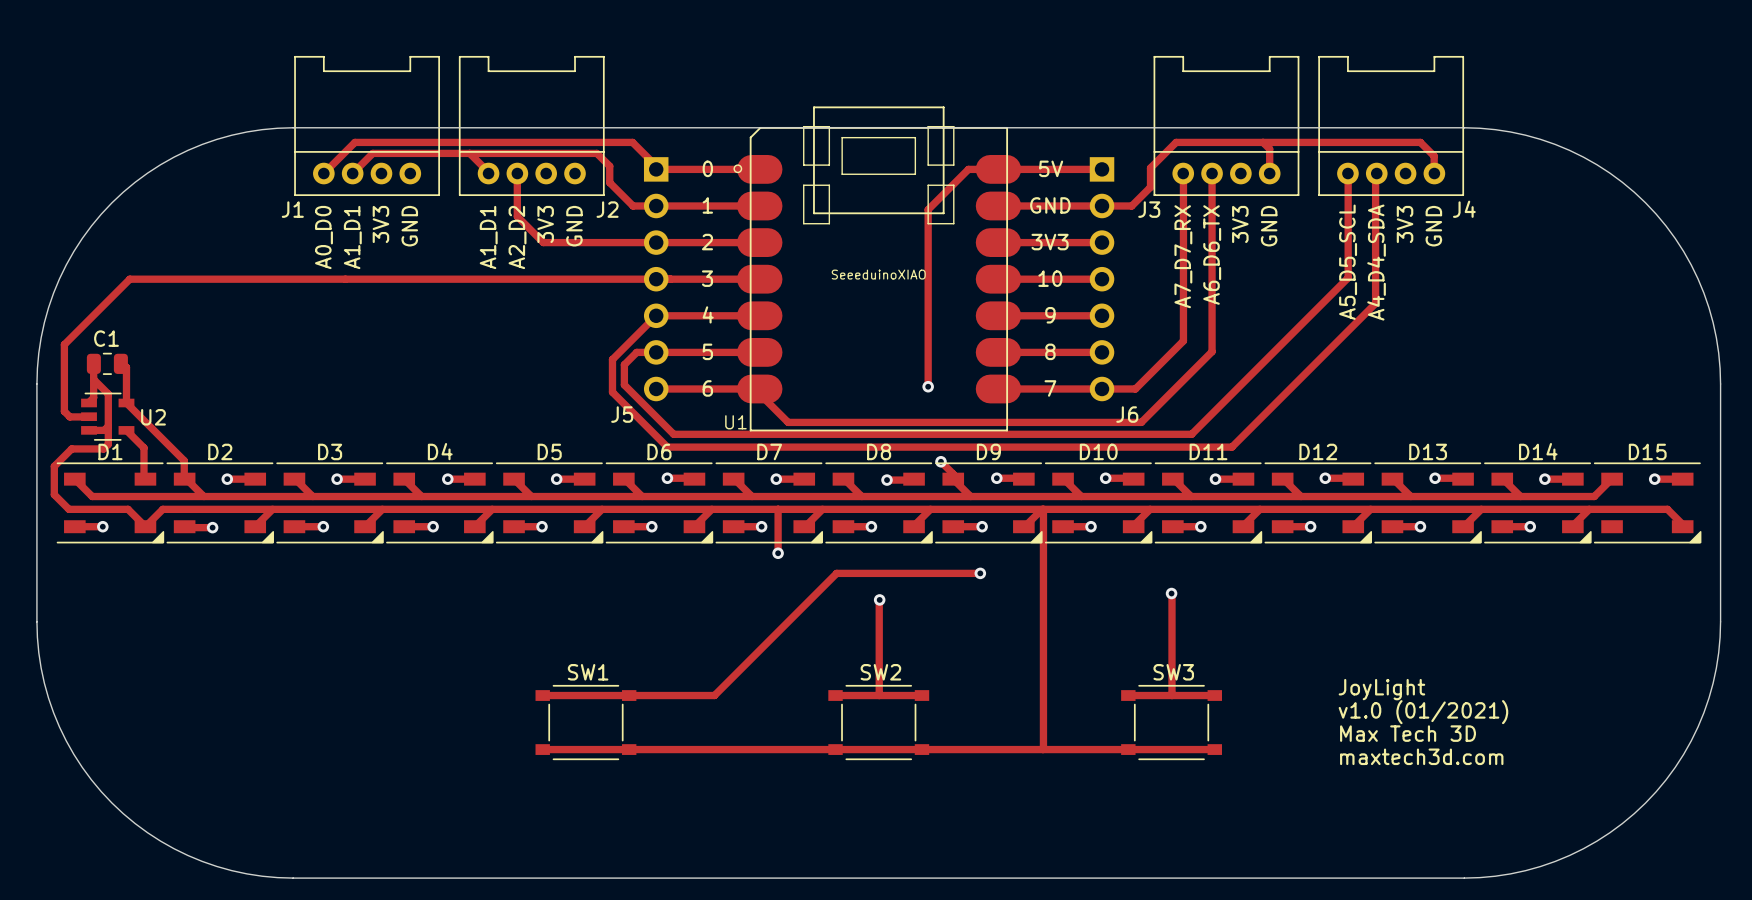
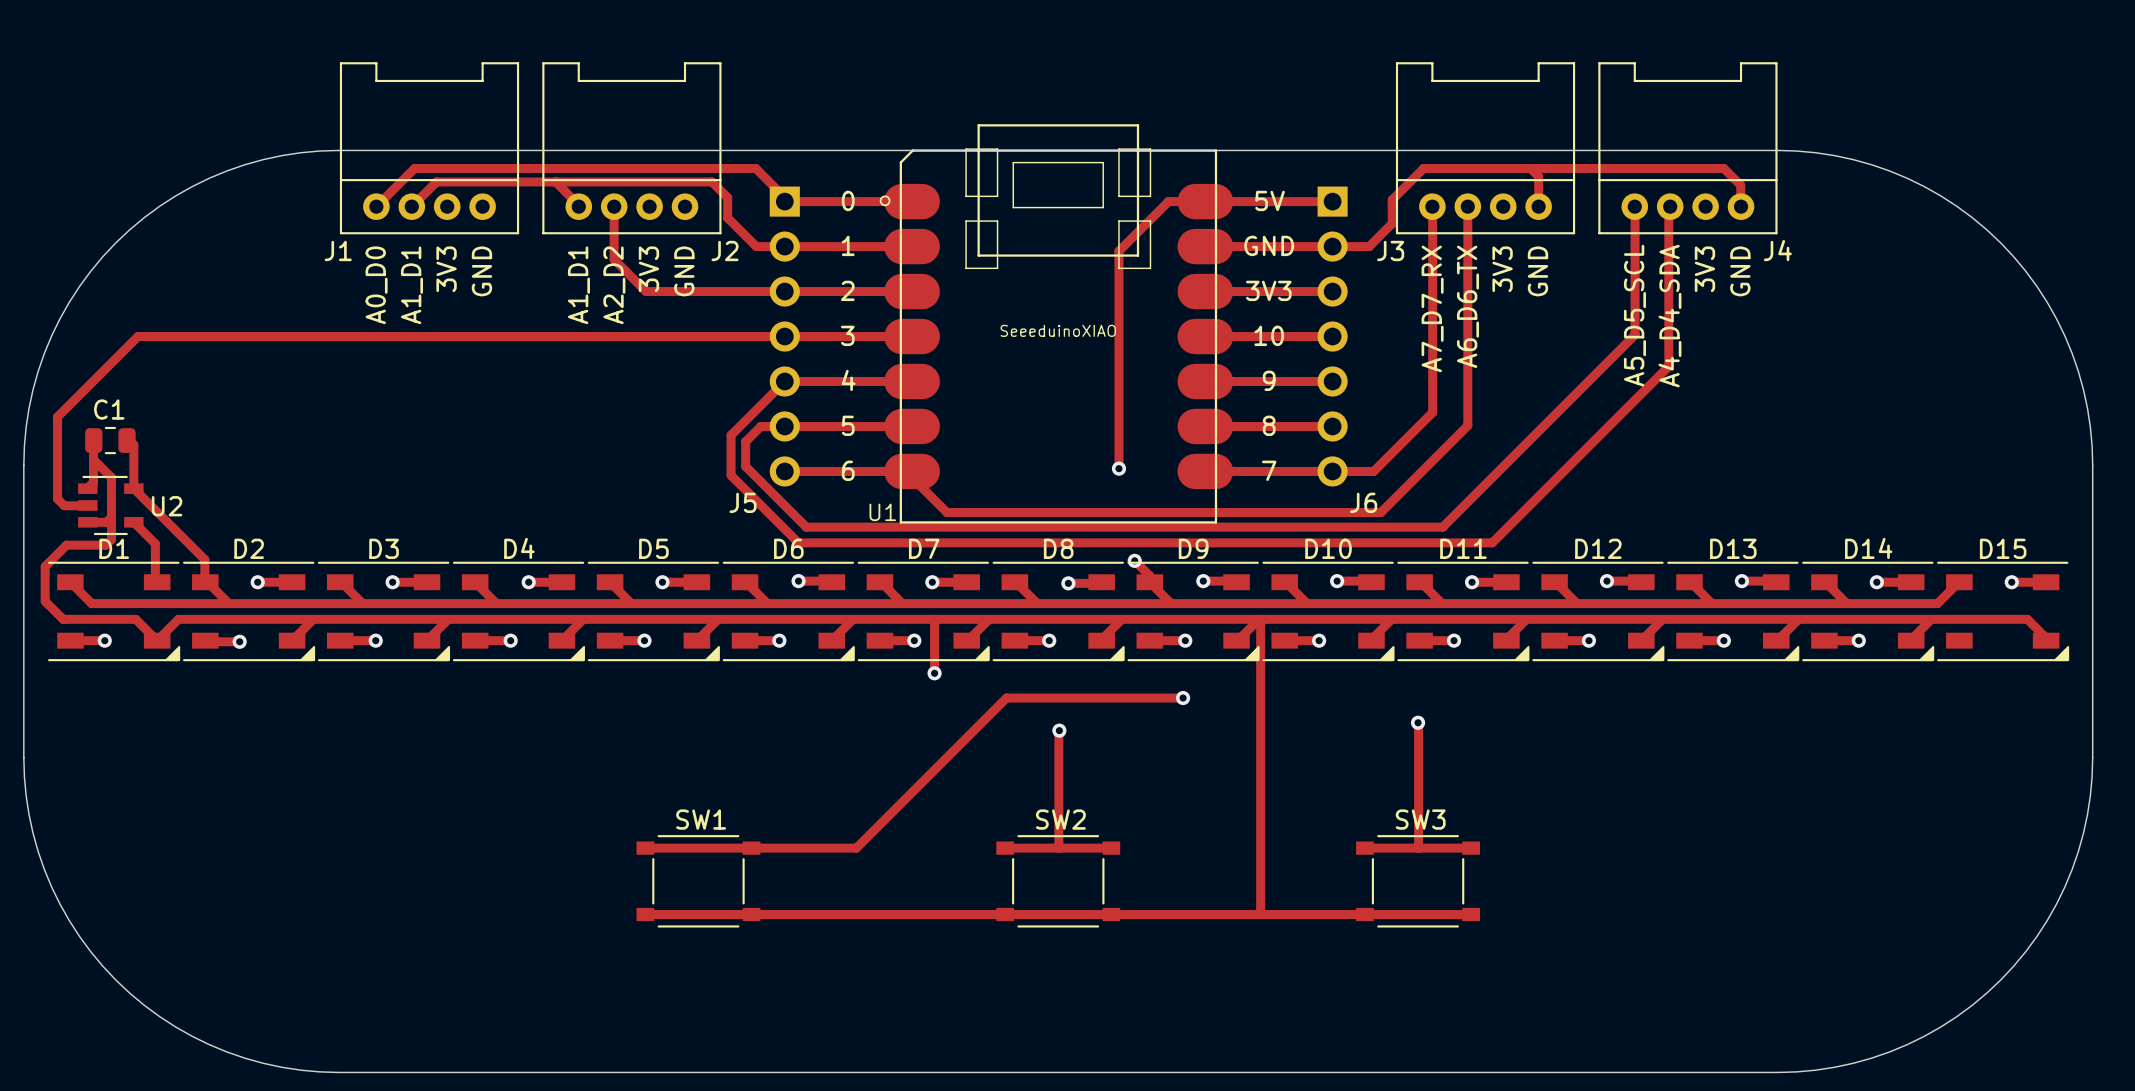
text: JoyLight (1381, 689) -> none
text: v1.0 (01/2021) (1423, 712) -> none
text: Max Tech 3D (1408, 733) -> none
text: maxtech3d.com (1421, 756) -> none

